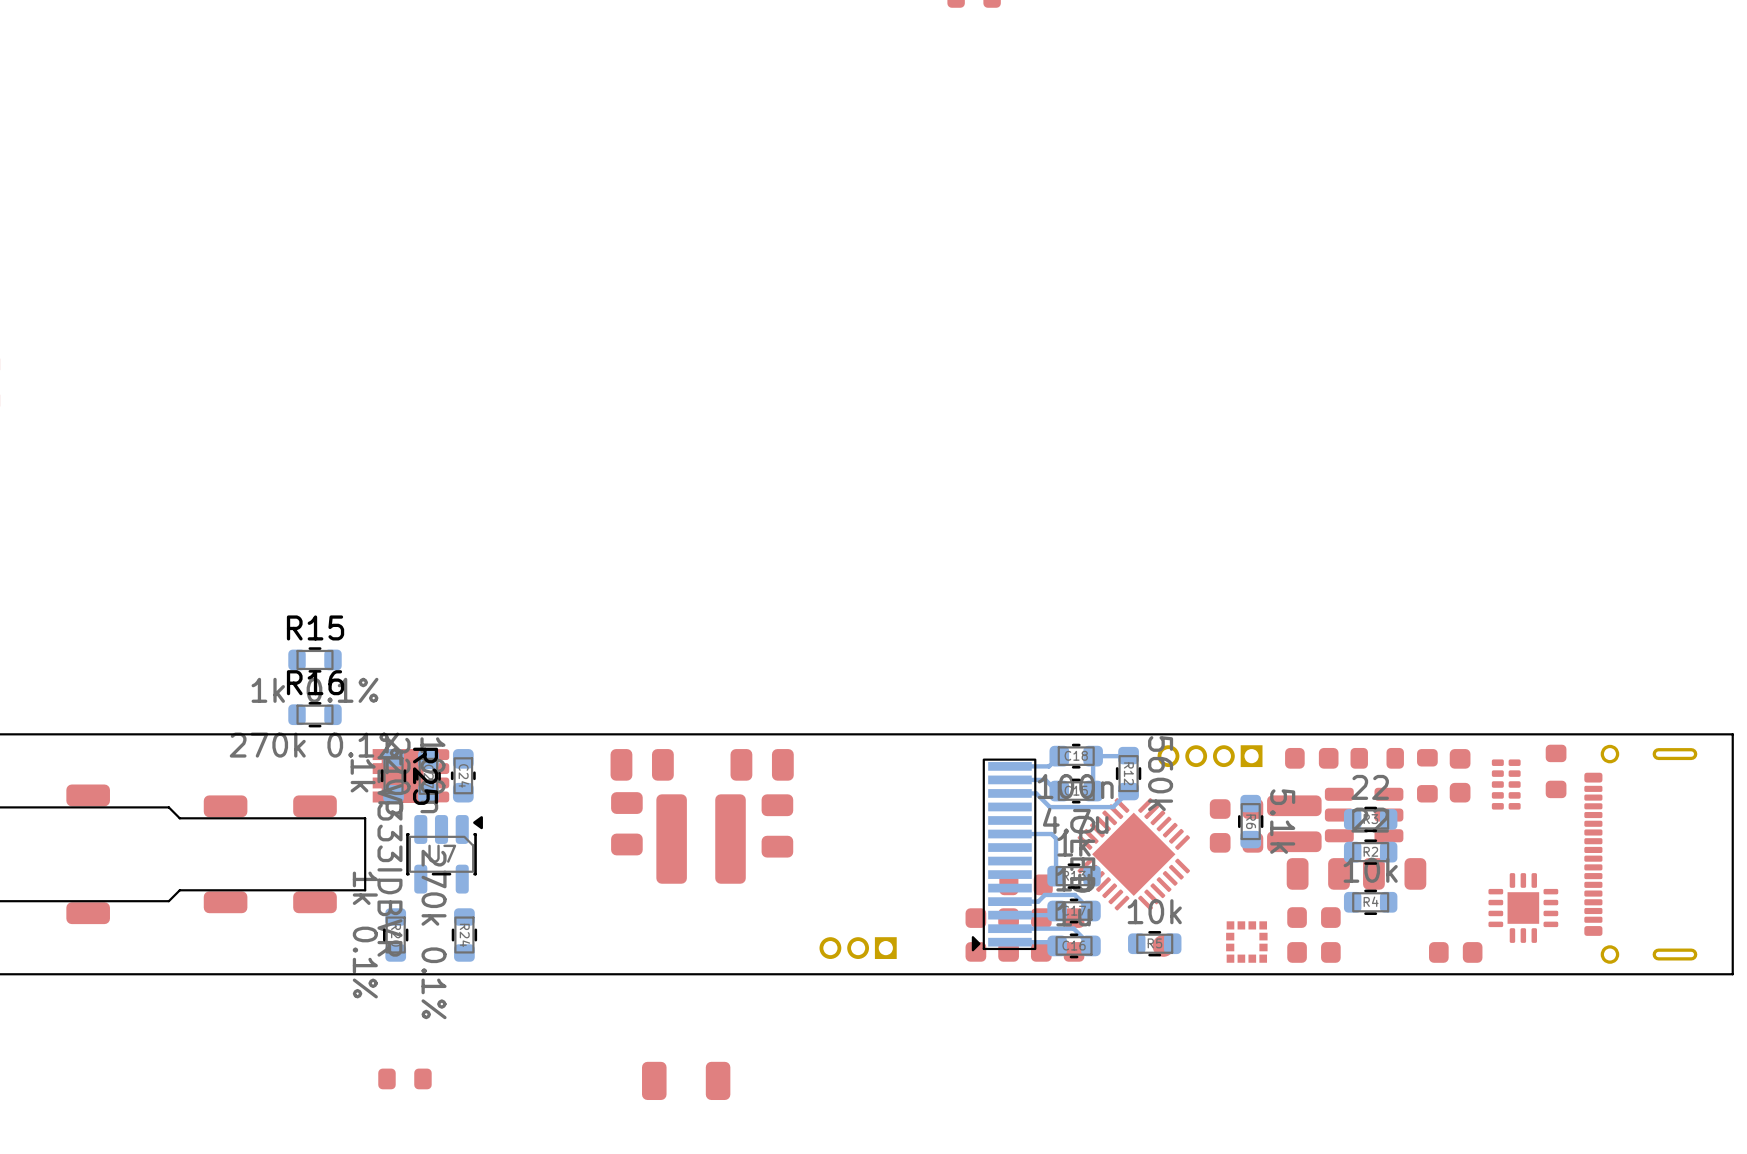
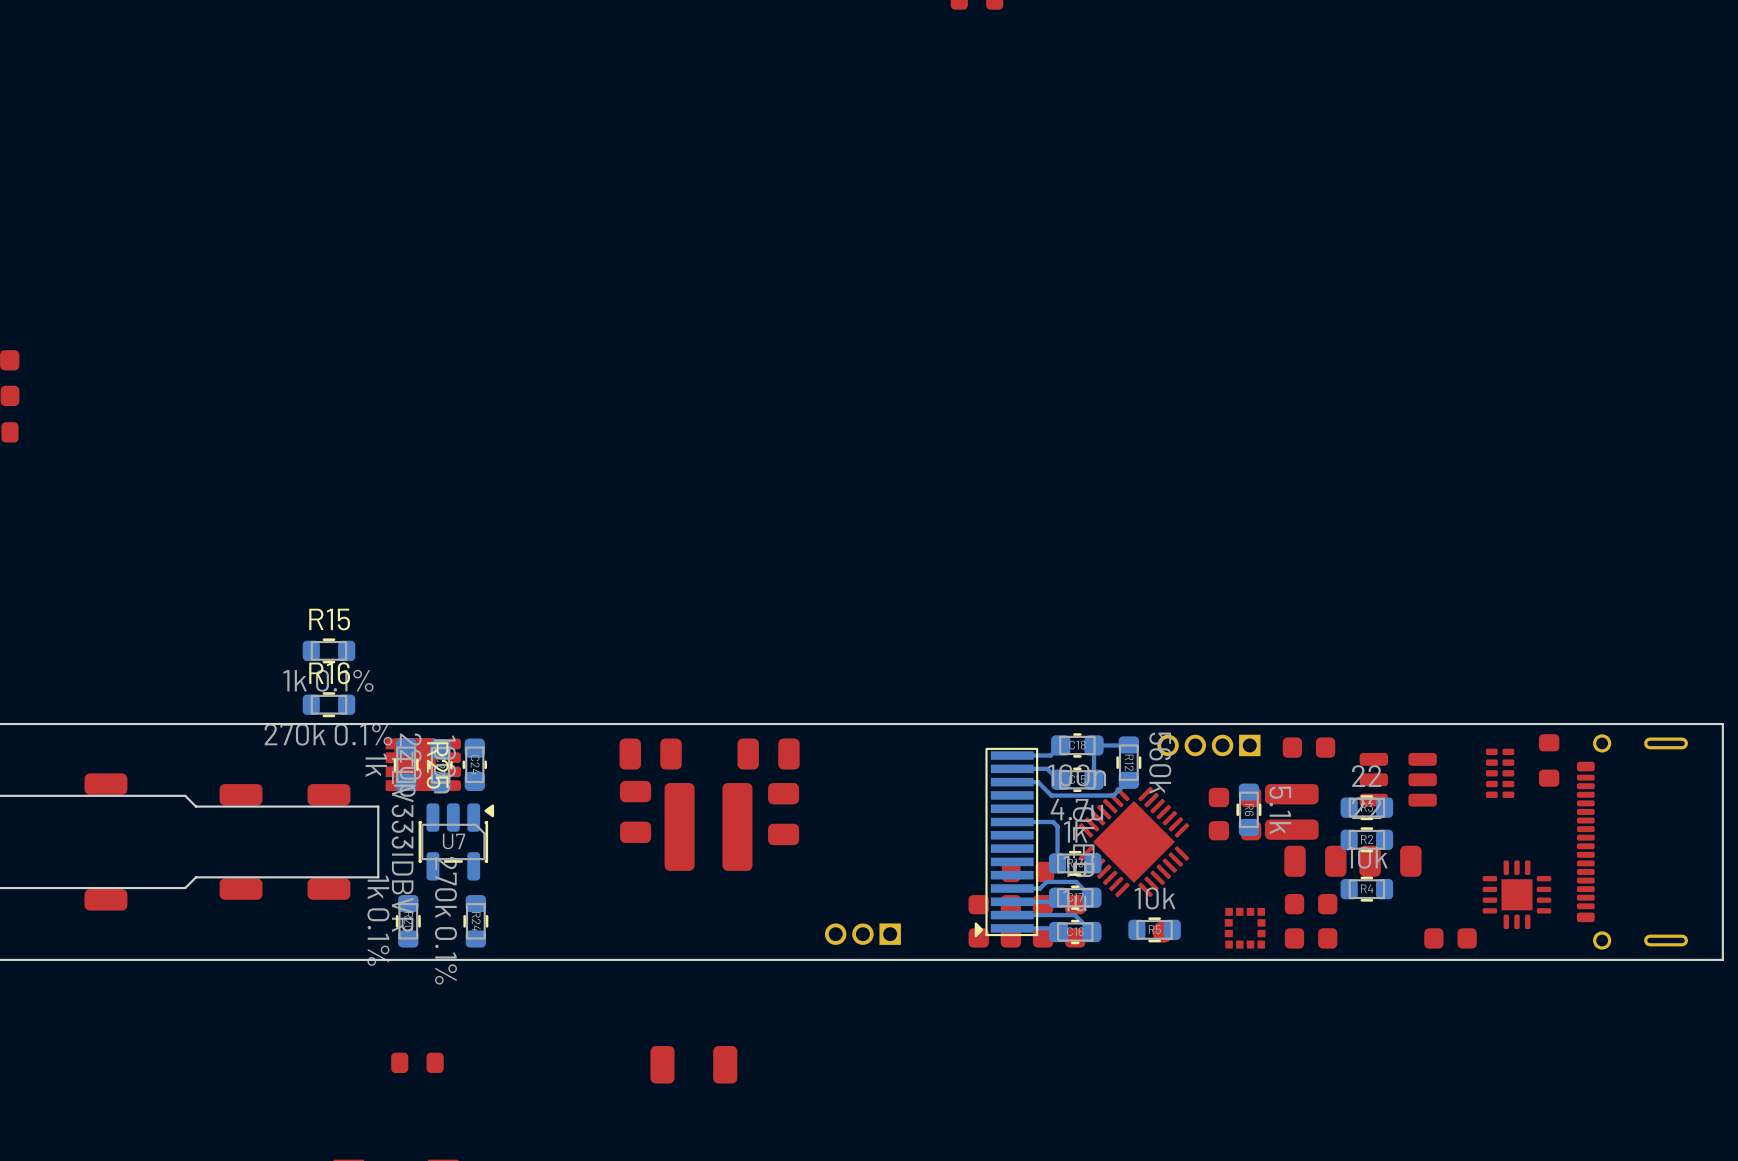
part: (1377, 758) -> none
part: (1427, 775) -> none
part: (1460, 775) -> none
part position: (1364, 815) -> (1398, 779)

